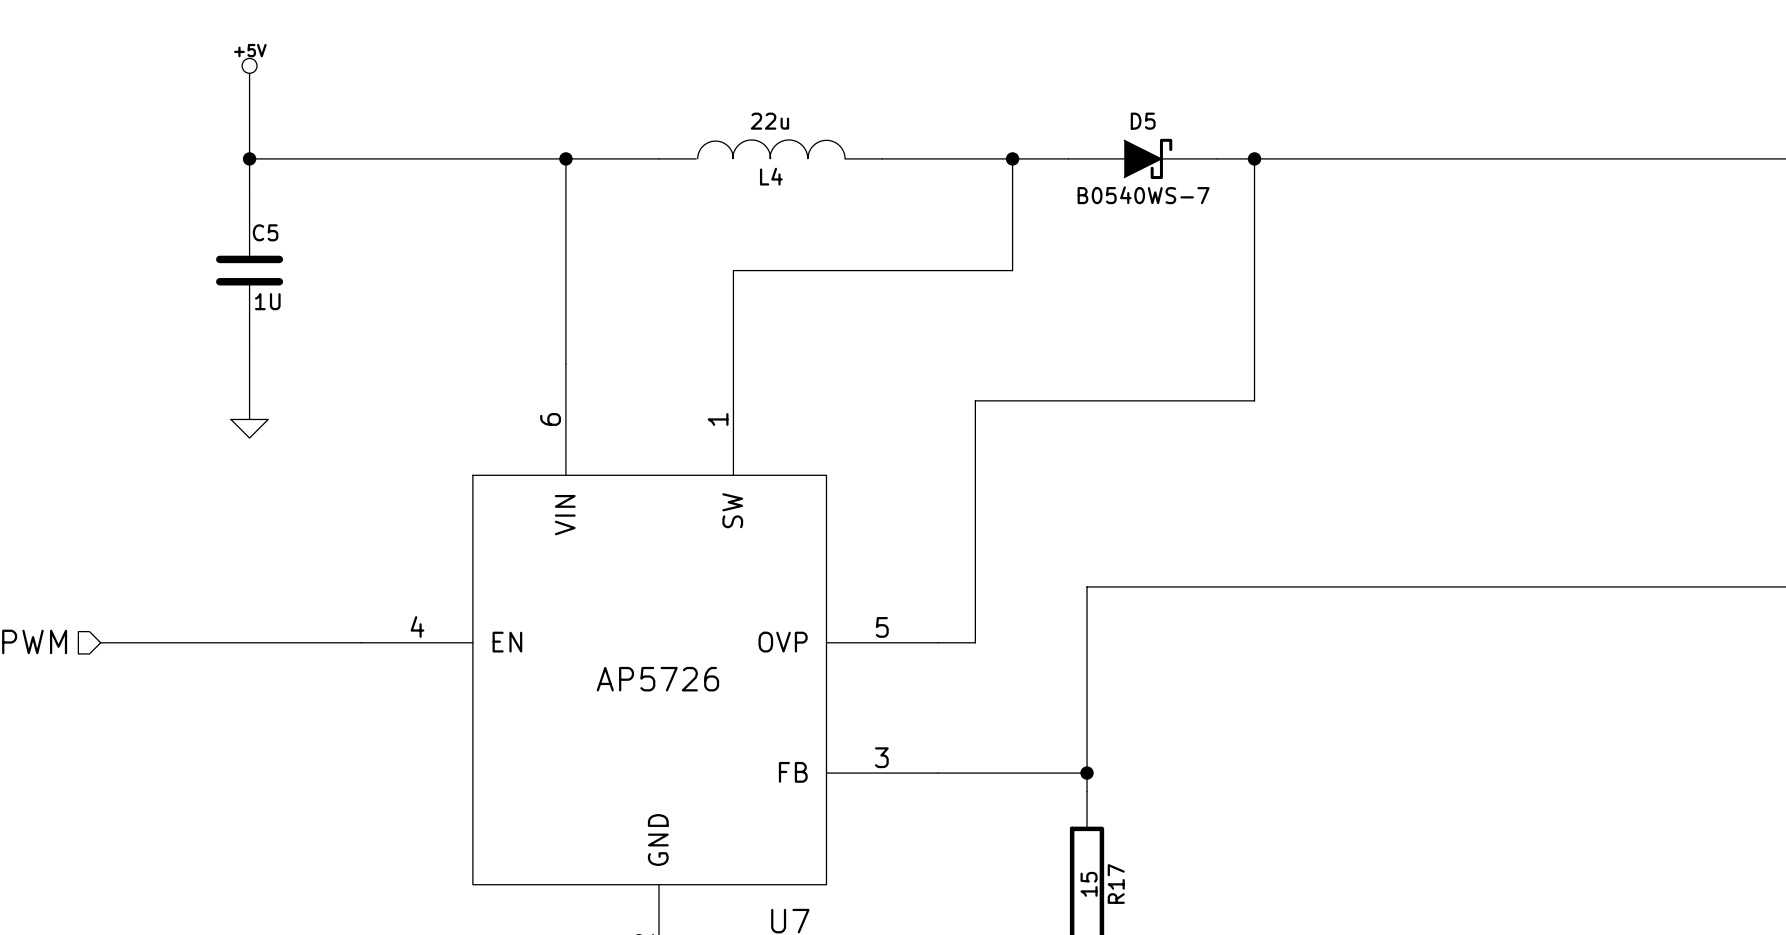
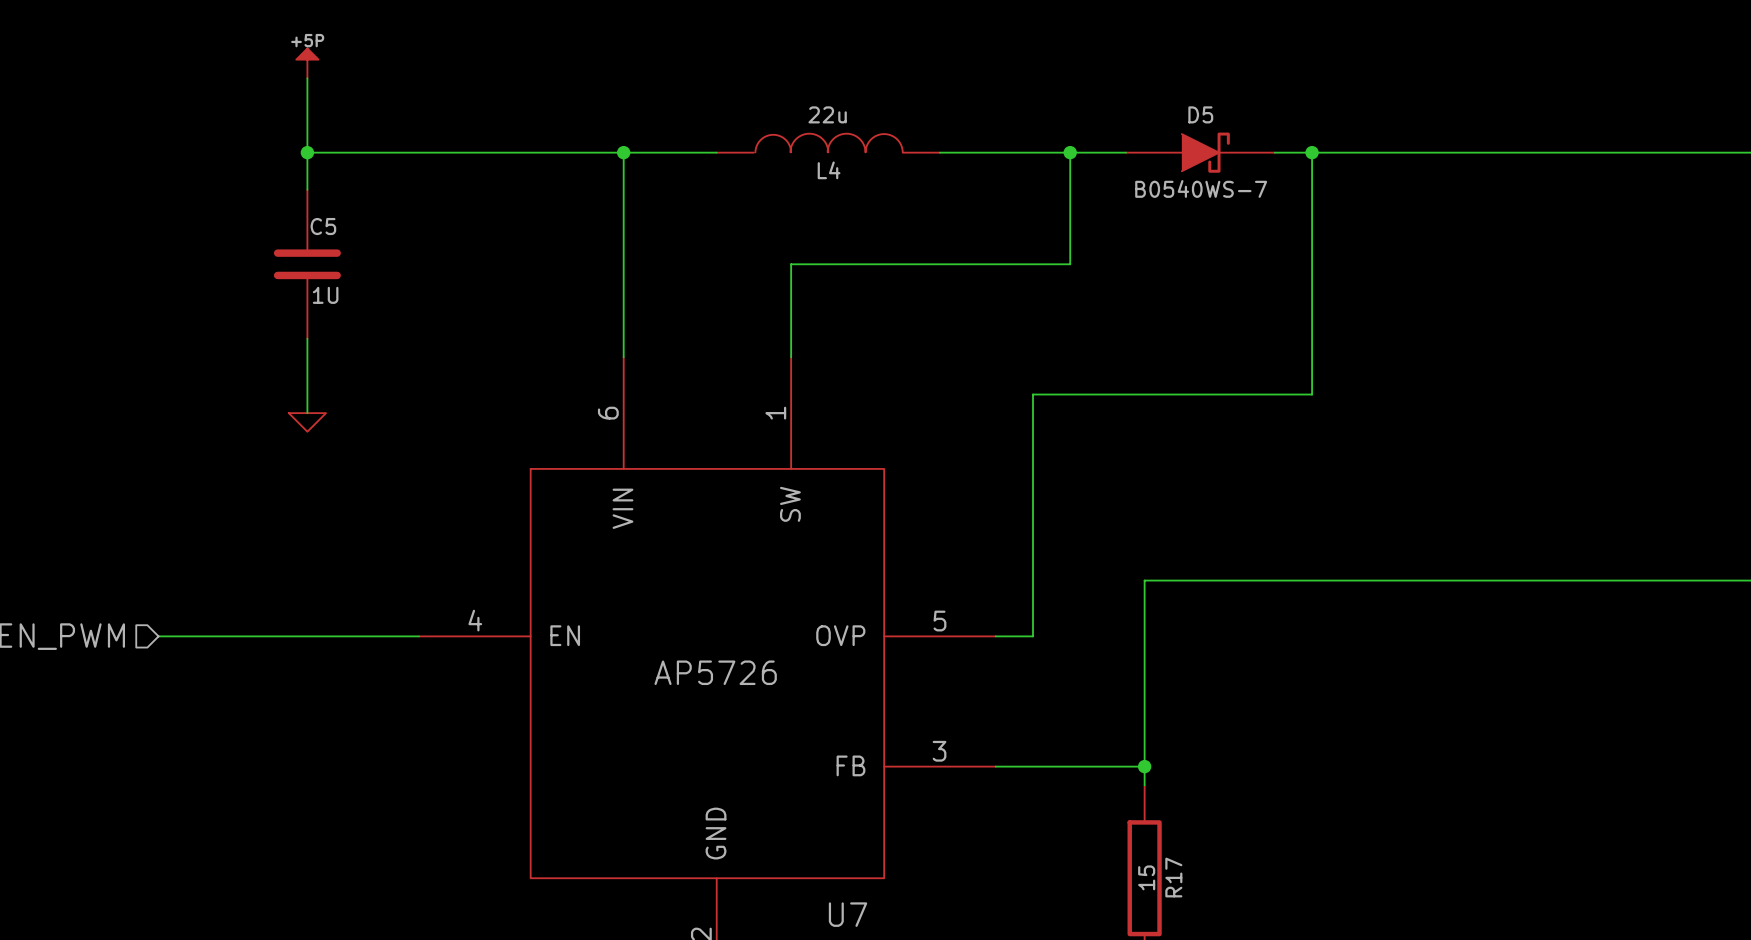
power symbol: +5V (249, 71) -> +5P (307, 63)

